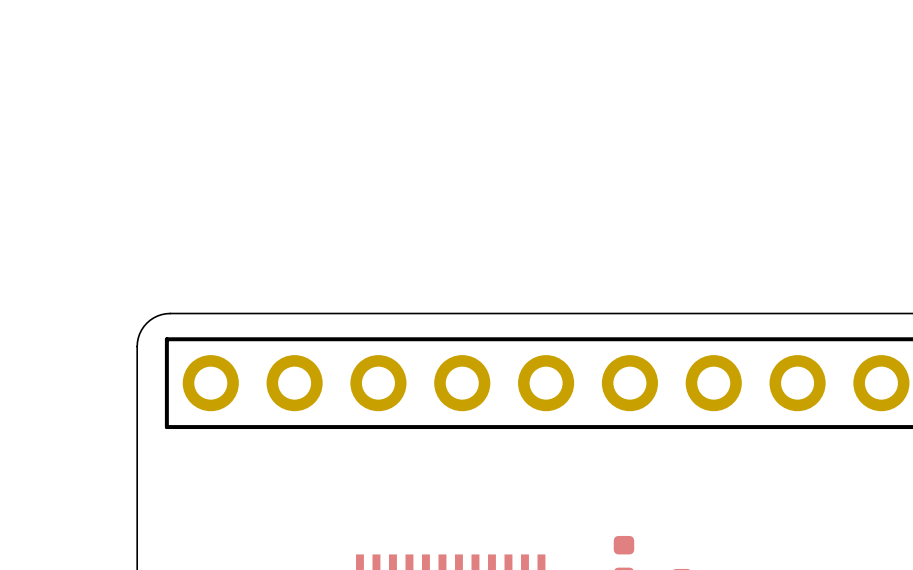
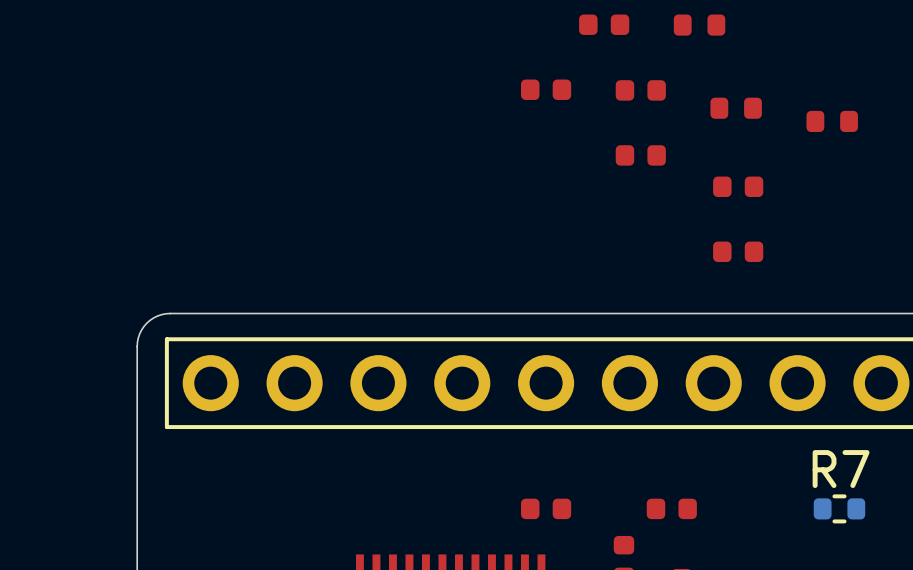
part: none -> (604, 24)
part: none -> (699, 25)
part: none -> (546, 89)
part: none -> (640, 90)
part: none -> (736, 108)
part: none -> (832, 121)
part: none -> (640, 155)
part: none -> (738, 186)
part: none -> (738, 251)
part: none -> (546, 508)
part: none -> (671, 508)
R7: none -> (839, 508)

